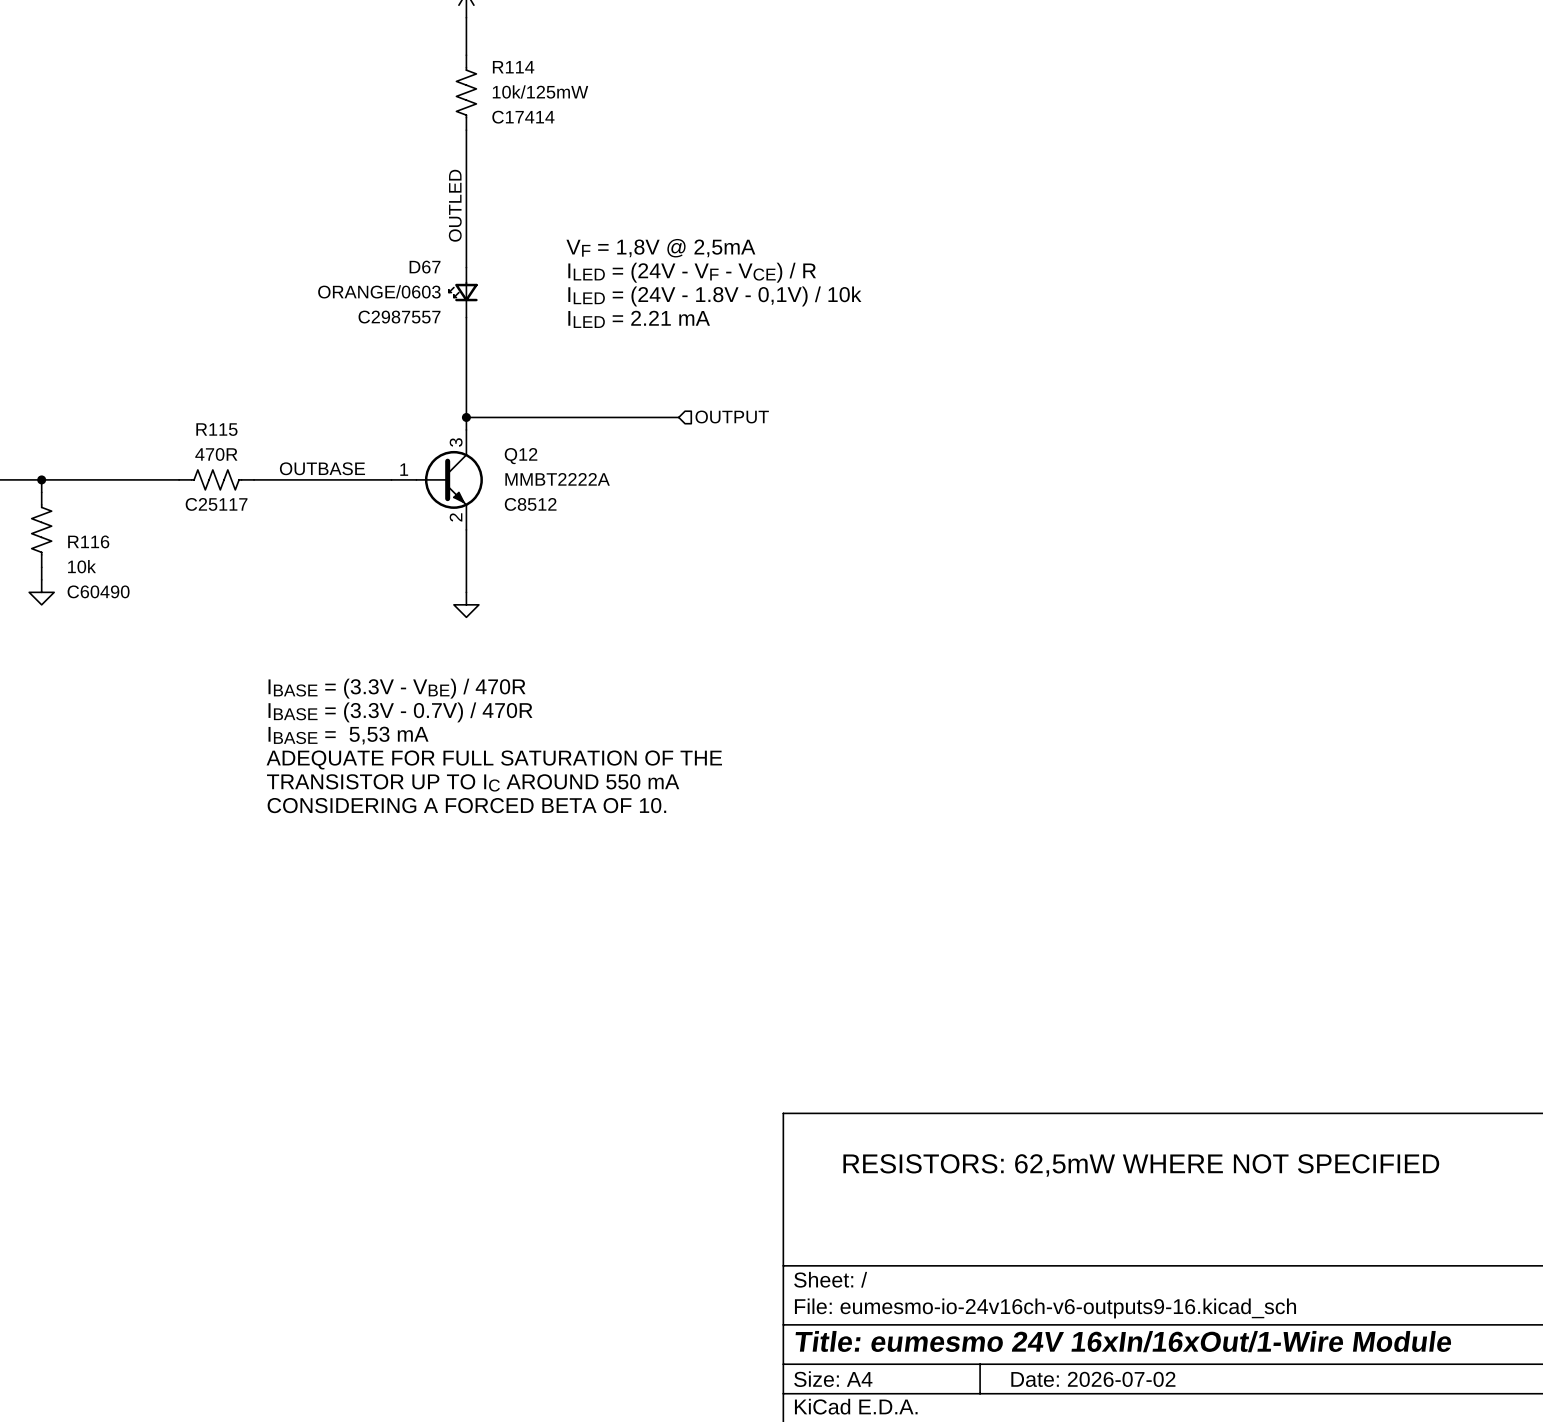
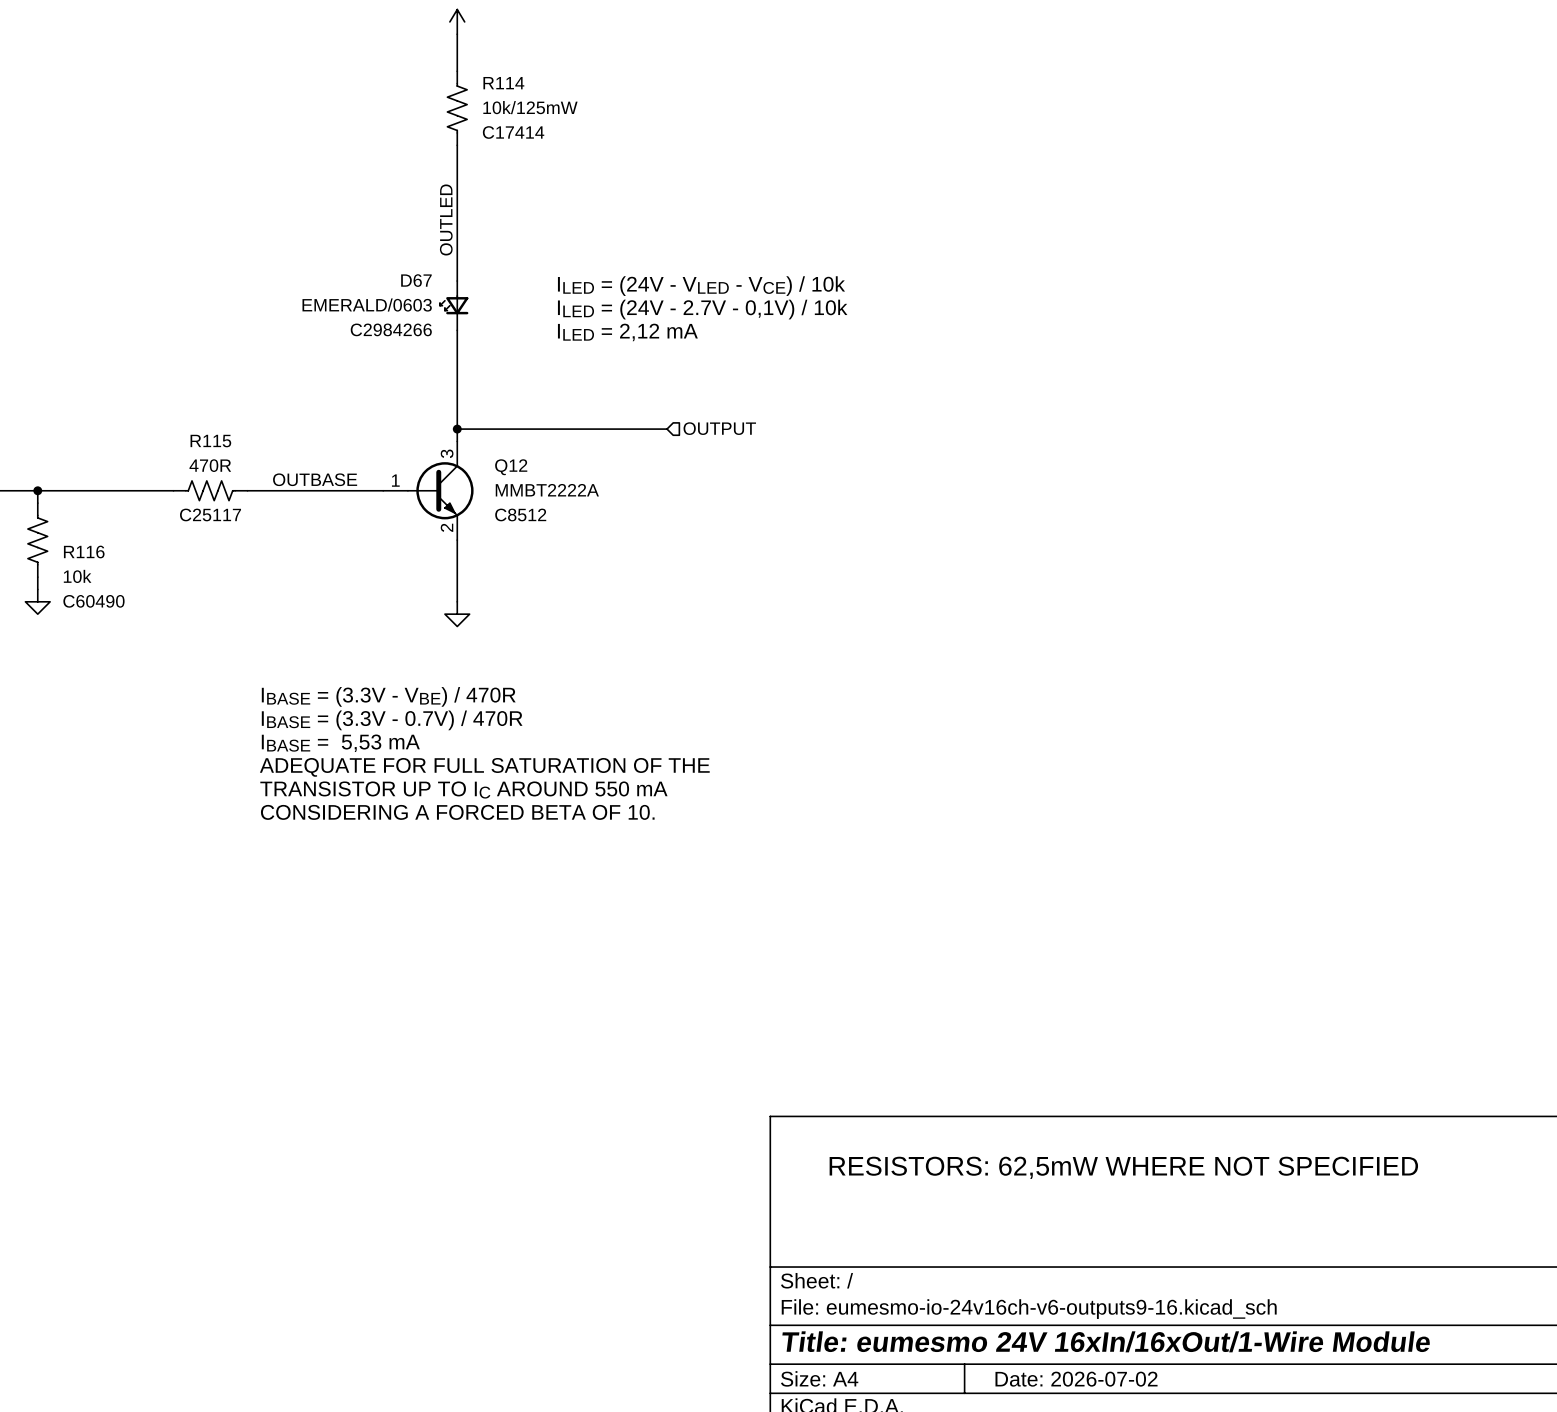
text: VF = 1,8V @ 2,5mA (660, 248) -> none
text: ILED = (24V - VF - VCE) / R (692, 272) -> ILED = (24V - VLED - VCE) / 10k (701, 286)
D67 value: ORANGE/0603 (379, 291) -> EMERALD/0603 (367, 304)
text: ILED = (24V - 1.8V - 0,1V) / 10k (714, 296) -> ILED = (24V - 2.7V - 0,1V) / 10k (702, 309)
D67 text: C2987557 (399, 317) -> C2984266 (391, 329)
text: ILED = 2.21 mA (639, 319) -> ILED = 2,12 mA (627, 332)

